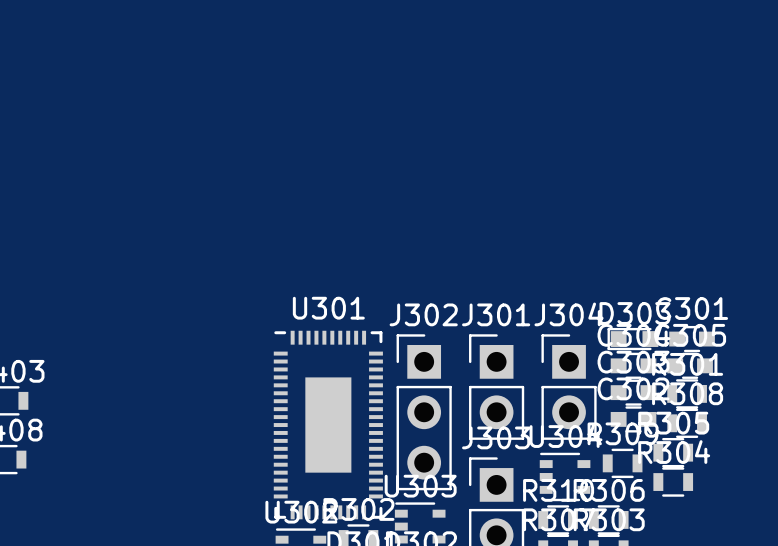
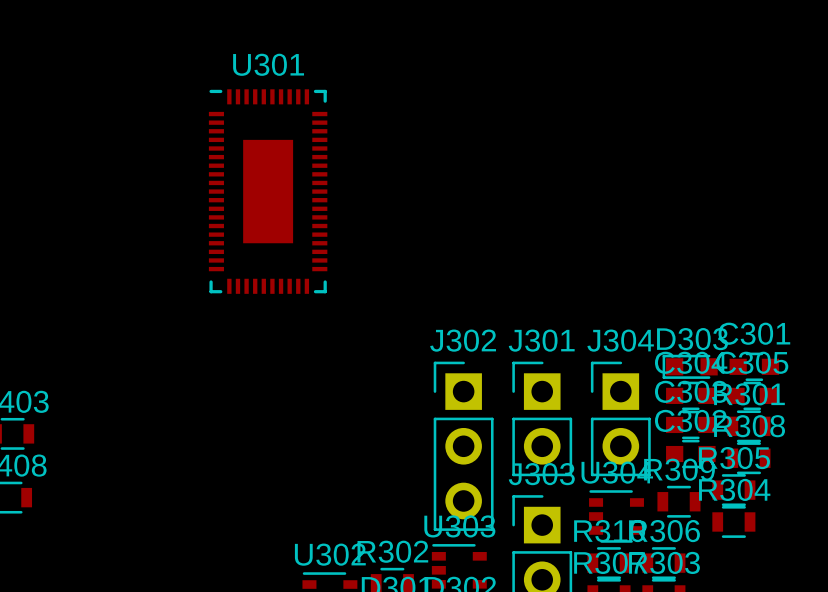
U301 position: (328, 425) -> (268, 191)

